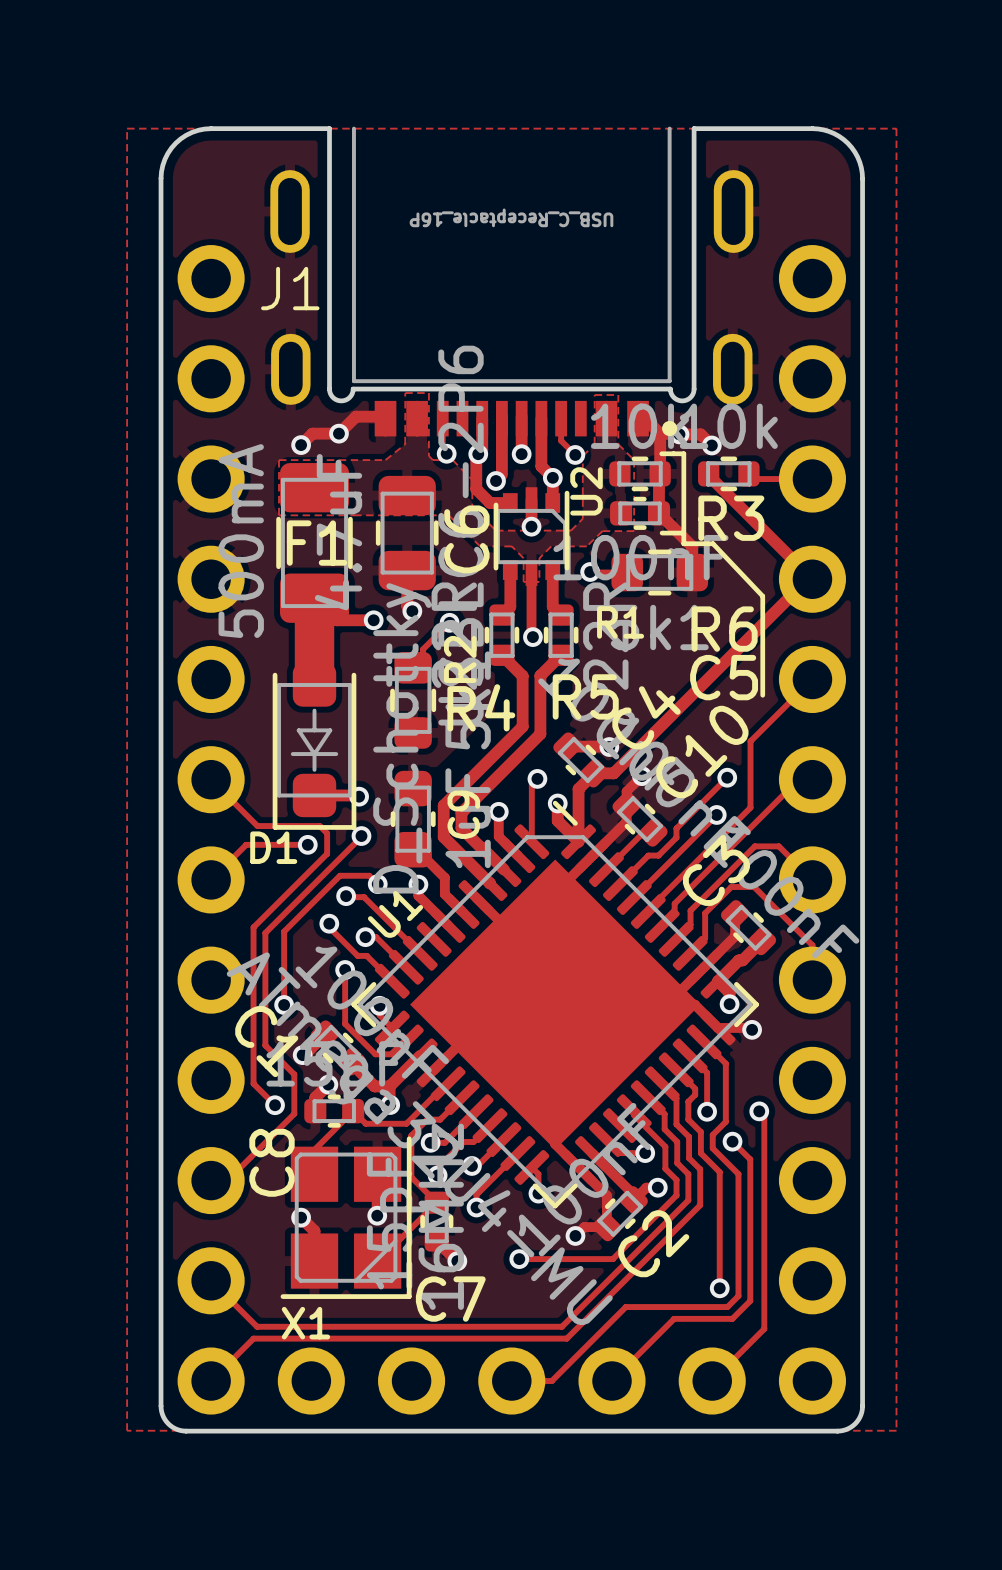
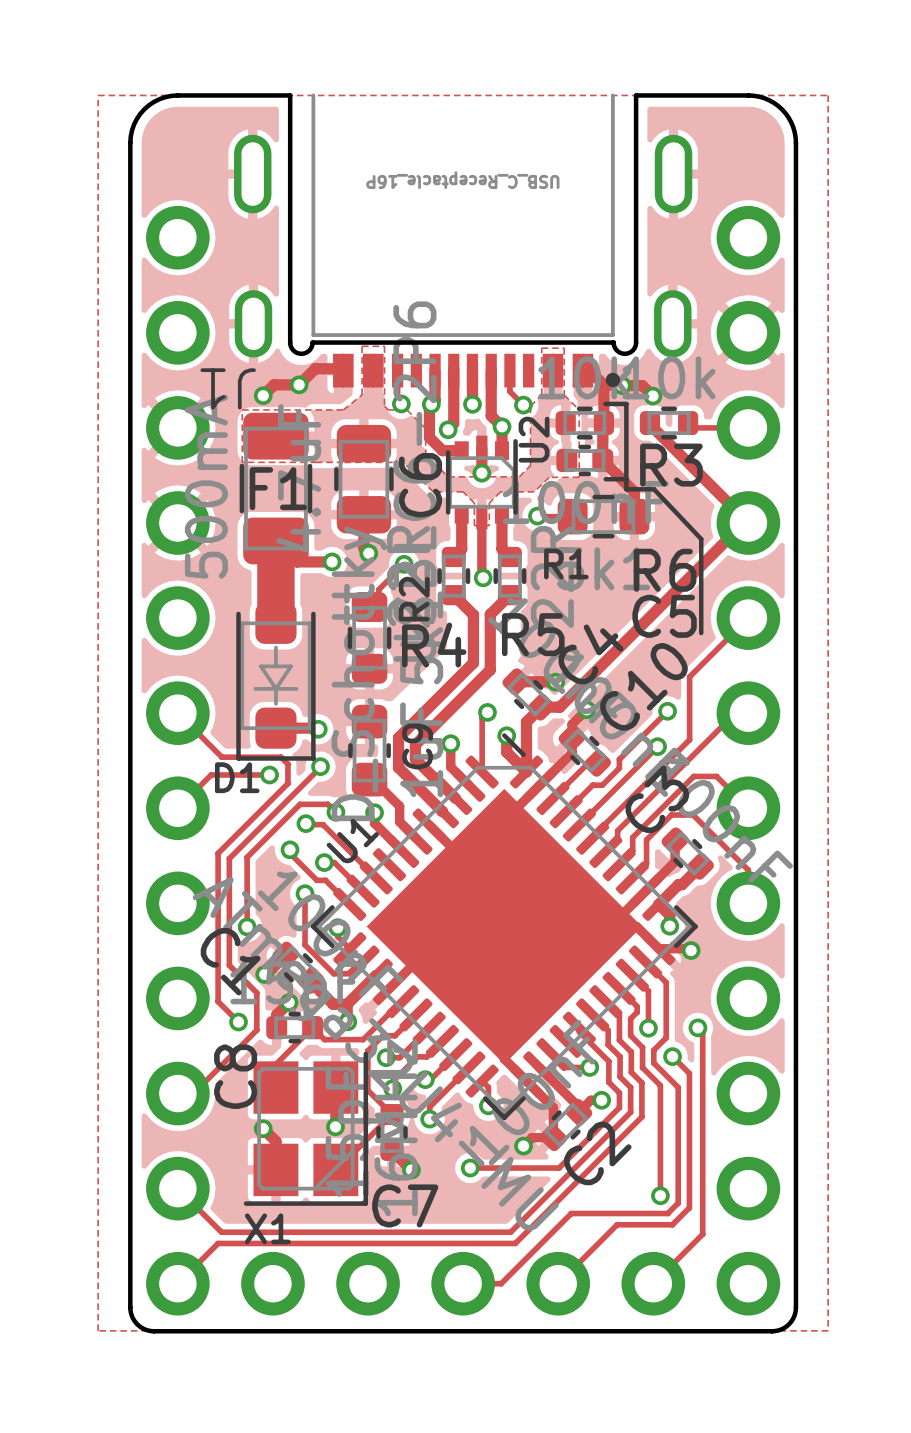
J1 name rotation: 0° (290, 288) -> 180° (228, 388)
J1 name position: J1 (290, 288) -> J1 (228, 388)

